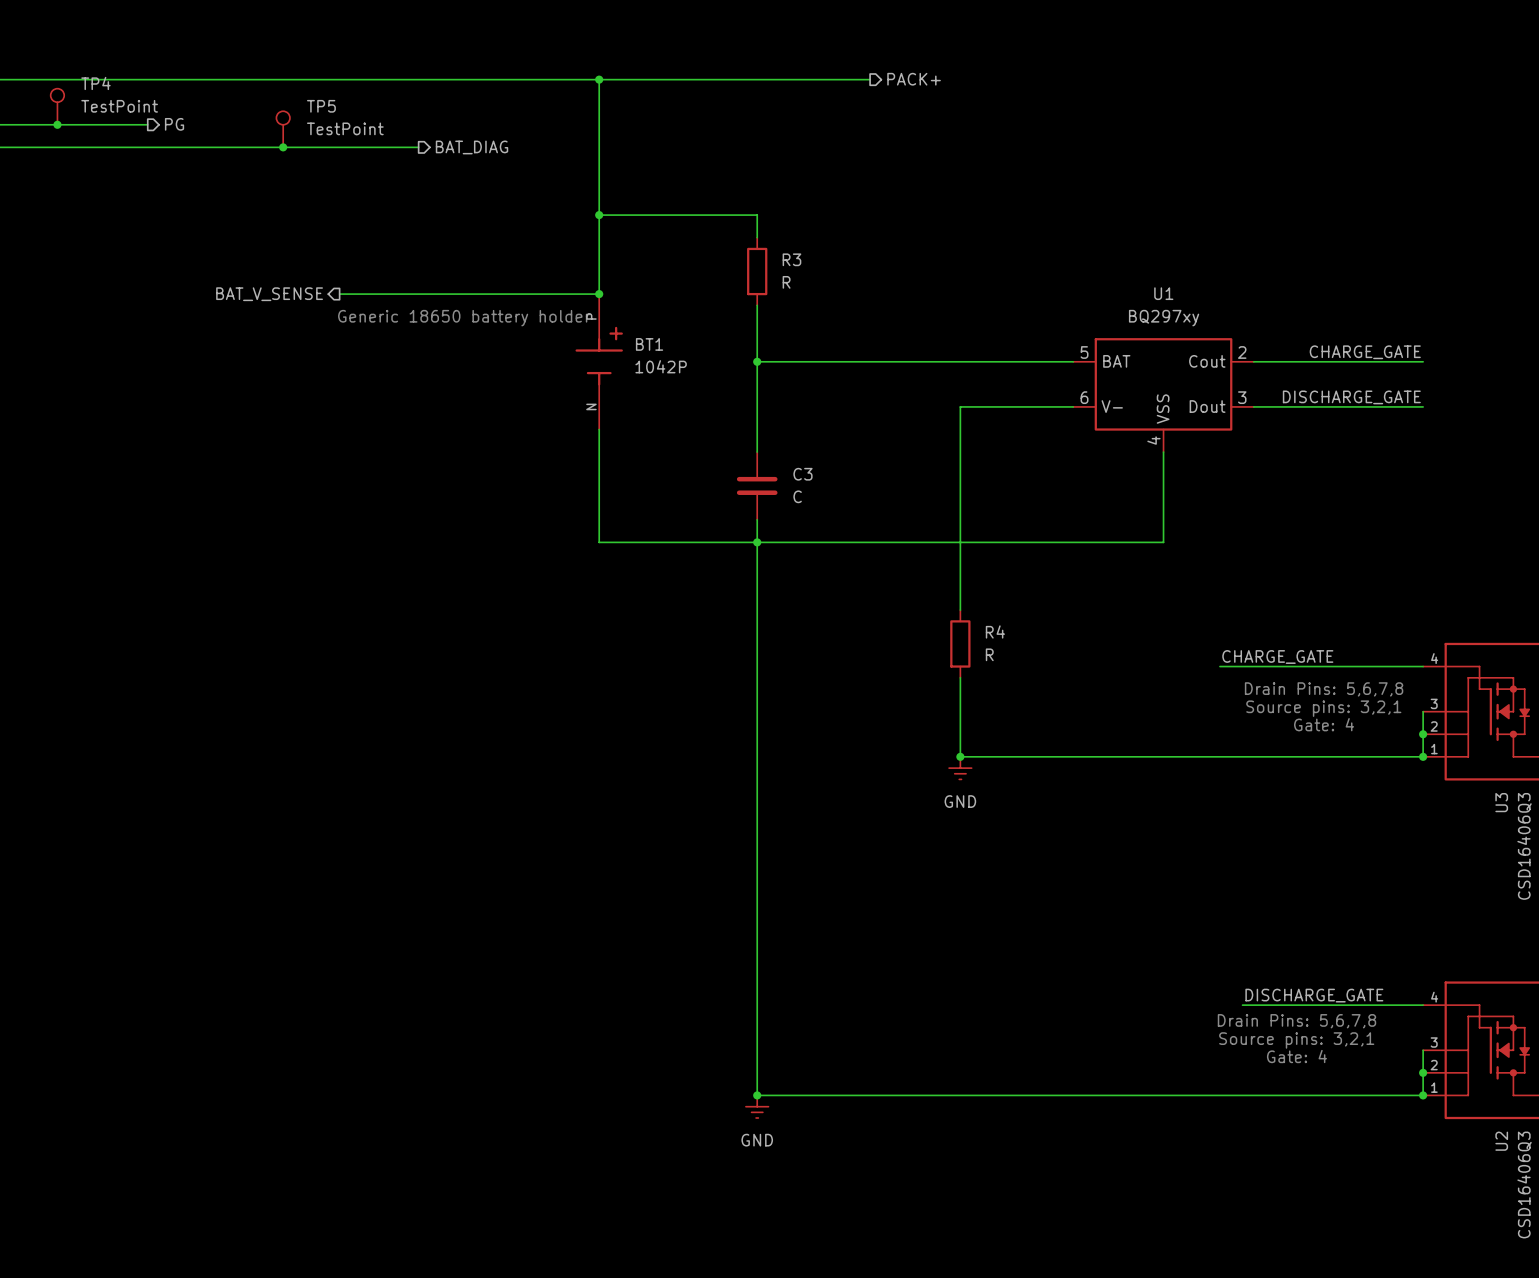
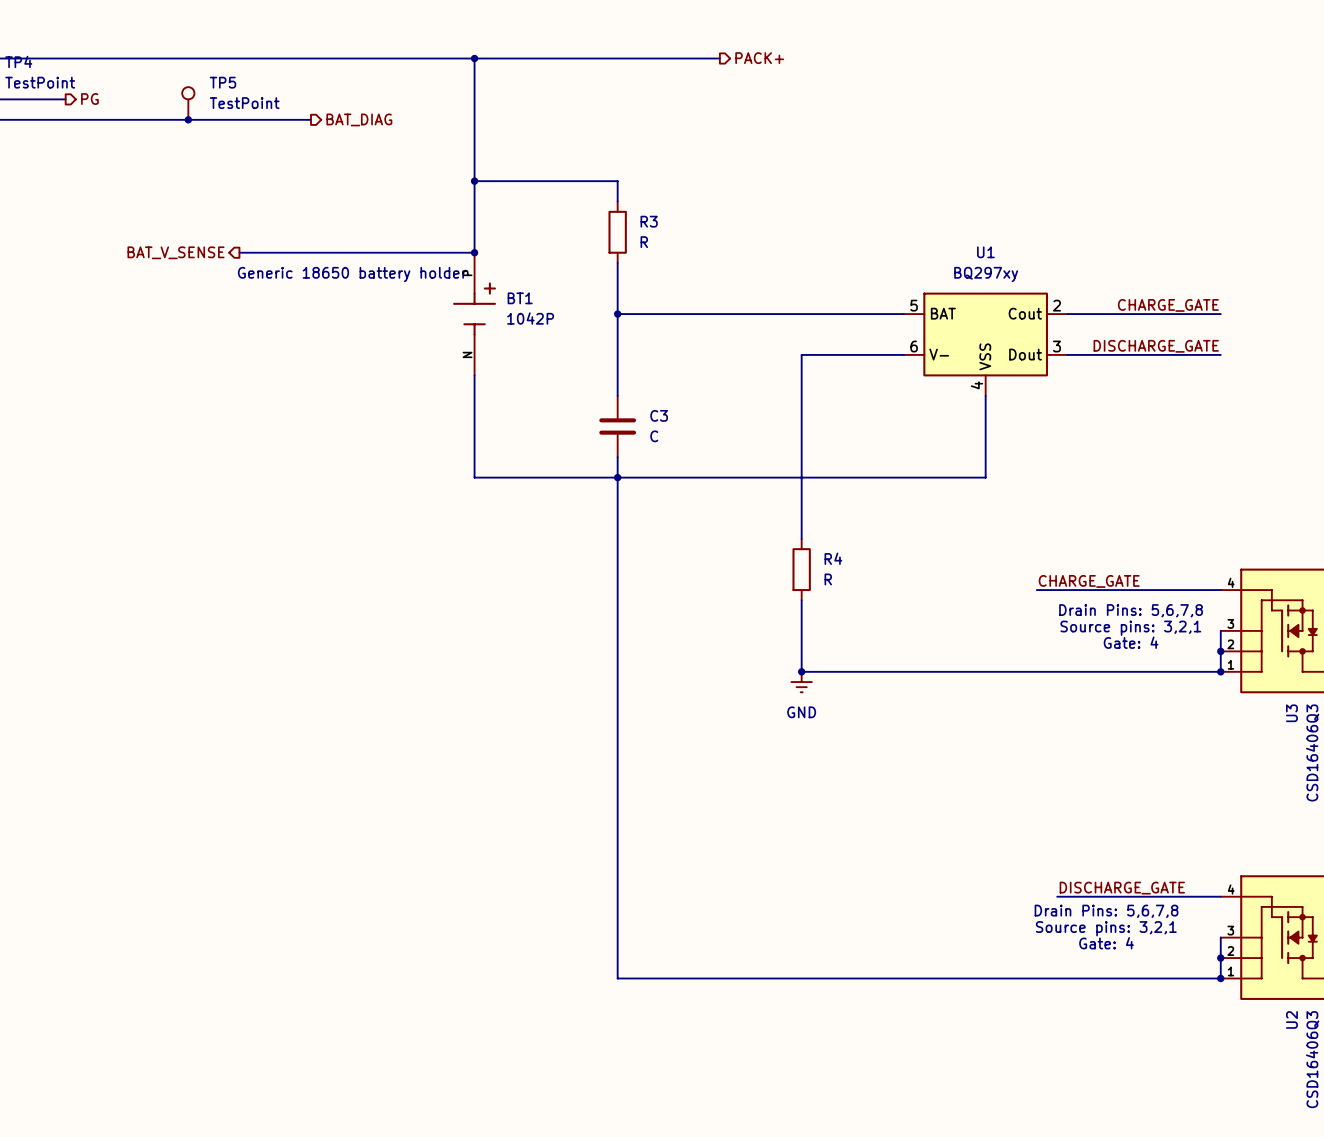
junction: (757, 1095) -> none
power symbol: GND (757, 1106) -> none

